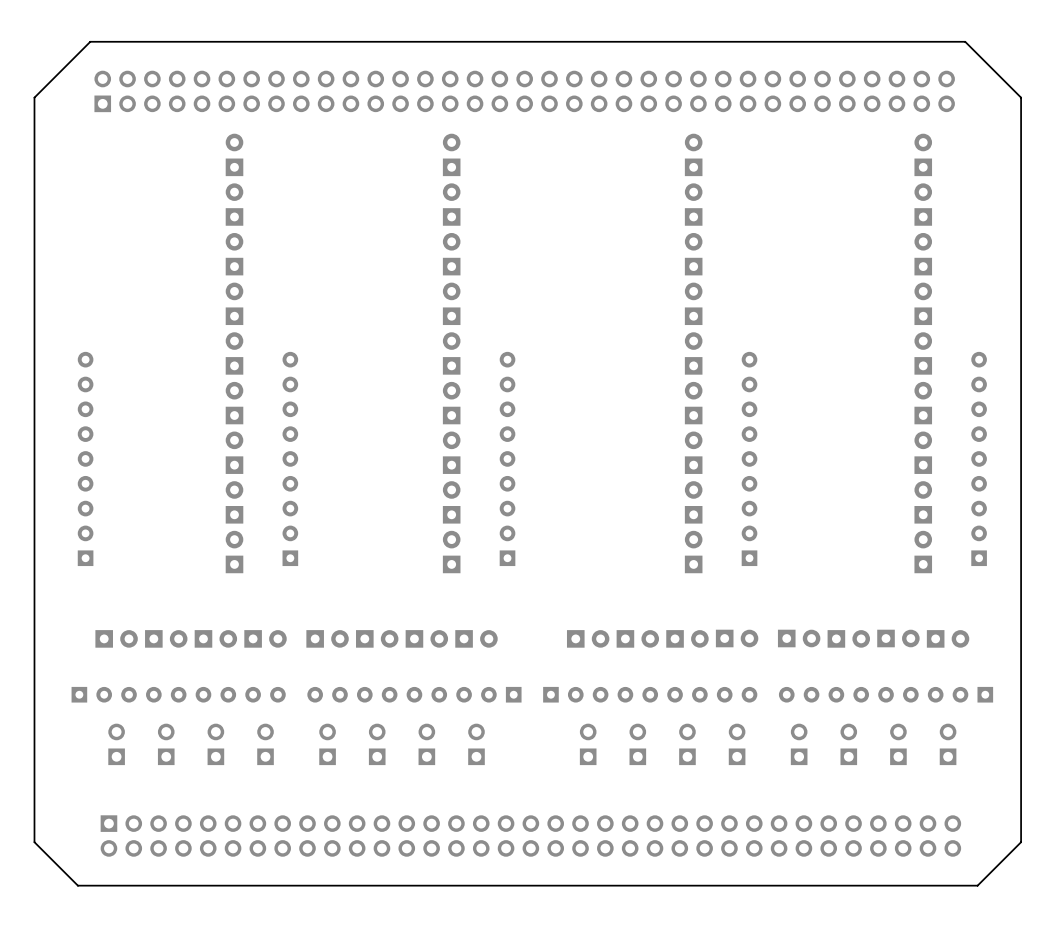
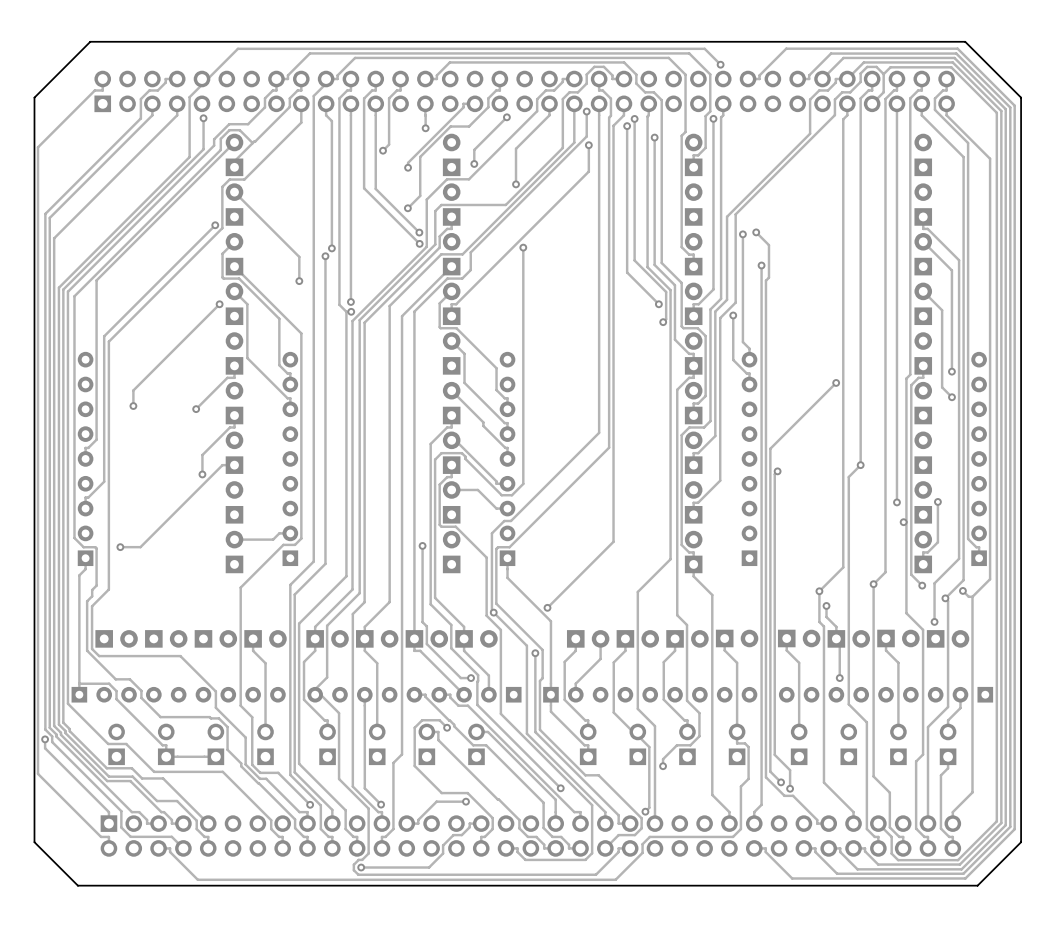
track: none -> (720, 64) (704, 48) (237, 48) (189, 97) (189, 157) (58, 287) (58, 724) (109, 776) (132, 776) (157, 801) (177, 801) (196, 820) (196, 829) (204, 836) (208, 836) (208, 848)
via: none -> (720, 64)
track: none -> (883, 74) (883, 92) (872, 103)
track: none -> (883, 74) (890, 67) (951, 67) (996, 112) (996, 821) (958, 860) (898, 860) (891, 853) (891, 836) (878, 823)
track: none -> (883, 74) (876, 66) (867, 66) (860, 73) (860, 81) (850, 92) (842, 92) (834, 99) (834, 115) (735, 214) (735, 302) (720, 318) (720, 480) (698, 502) (693, 502) (693, 514)
track: none -> (102, 79) (102, 90) (94, 90) (38, 147) (38, 773) (101, 836) (108, 836) (108, 848)
track: none -> (177, 79) (165, 79) (165, 82) (157, 90) (149, 90) (140, 99) (140, 118) (45, 213) (45, 729) (52, 736) (52, 742) (121, 811) (121, 827) (130, 836) (171, 836) (183, 848)
track: none -> (301, 79) (301, 90) (297, 90) (289, 98) (289, 106) (252, 143)
track: none -> (326, 79) (337, 79) (337, 75) (355, 57) (668, 57) (685, 74) (685, 131) (681, 135) (681, 247) (689, 254) (693, 254) (693, 266)
track: none -> (330, 79) (313, 96) (313, 561) (290, 584) (290, 774) (320, 805) (320, 829) (328, 836) (332, 836) (332, 848)
track: none -> (350, 79) (350, 90) (347, 90) (339, 98) (339, 304) (346, 311)
track: none -> (375, 79) (375, 90) (372, 90) (364, 98) (364, 188) (419, 243)
track: none -> (400, 79) (400, 90) (396, 90) (389, 98) (389, 144) (383, 150)
track: none -> (425, 79) (436, 79) (436, 75) (449, 62) (624, 62) (636, 74) (636, 83) (645, 92) (653, 92) (661, 100) (661, 263) (681, 282) (681, 326) (683, 328) (697, 328) (705, 336) (705, 396) (698, 403) (693, 403) (693, 415)
track: none -> (499, 79) (499, 90) (496, 90) (488, 98) (488, 107) (469, 126) (450, 126) (420, 156) (420, 195) (407, 208)
track: none -> (574, 79) (562, 79) (562, 81) (554, 90) (545, 90) (537, 99) (537, 111) (469, 179) (447, 179) (426, 199) (426, 246) (352, 321) (352, 589) (315, 626) (315, 650) (304, 662) (304, 699) (324, 720) (327, 720) (327, 731)
track: none -> (599, 79) (599, 90) (602, 90) (610, 98) (610, 115) (609, 117) (609, 447) (509, 547) (496, 548) (496, 603) (542, 649) (542, 678) (539, 680) (539, 729) (585, 775) (598, 775) (641, 818) (641, 828) (634, 835) (618, 835) (605, 848)
track: none -> (623, 79) (612, 79) (612, 75) (603, 66) (594, 66) (586, 74) (586, 83) (577, 92) (569, 92) (562, 99) (562, 147) (505, 204) (441, 204) (435, 211) (435, 244) (359, 320) (359, 593) (327, 625) (327, 677) (315, 689) (315, 694)
track: none -> (748, 79) (759, 79) (759, 75) (786, 48) (957, 48) (1014, 105) (1014, 829) (965, 878) (792, 878) (765, 852) (765, 848) (754, 848)
track: none -> (797, 79) (809, 79) (809, 75) (831, 53) (956, 53) (1010, 107) (1010, 826) (963, 873) (837, 873) (815, 852) (815, 848) (803, 848)
track: none -> (822, 79) (843, 57) (954, 57) (1005, 109) (1005, 825) (961, 869) (857, 869) (840, 852) (840, 848) (828, 848)
track: none -> (872, 79) (872, 90) (868, 90) (860, 98) (860, 465) (848, 477) (848, 704) (866, 722) (866, 829) (874, 836) (878, 836) (878, 848)
track: none -> (896, 79) (896, 90) (894, 90) (885, 99) (885, 572) (873, 584) (873, 776) (889, 792) (889, 827) (899, 836) (903, 836) (903, 848)
track: none -> (921, 79) (921, 90) (918, 90) (910, 98) (910, 374) (906, 378) (906, 613) (923, 629) (923, 754) (916, 761) (916, 828) (924, 836) (928, 836) (928, 848)
track: none -> (946, 79) (946, 90) (943, 90) (934, 98) (934, 109) (968, 143) (968, 538) (976, 547) (979, 547) (979, 558)
track: none -> (152, 103) (152, 115) (49, 217) (49, 727) (131, 812) (139, 812) (147, 820) (147, 823) (158, 823)
track: none -> (177, 103) (177, 115) (54, 238) (54, 725) (107, 781) (130, 781) (171, 819) (171, 823) (183, 823)
track: none -> (301, 103) (301, 122) (244, 179) (229, 179) (222, 186) (222, 228) (108, 341) (108, 589) (92, 606) (92, 648) (99, 656) (180, 656) (215, 691) (215, 707) (245, 737) (245, 764) (259, 778) (266, 778) (299, 812) (307, 812) (307, 823)
track: none -> (326, 103) (326, 115) (331, 121) (331, 248)
track: none -> (350, 103) (350, 301)
track: none -> (375, 103) (375, 188) (419, 232)
track: none -> (425, 103) (425, 128)
track: none -> (475, 103) (463, 103) (463, 107) (408, 162) (408, 167)
track: none -> (549, 103) (549, 115) (516, 148) (516, 184)
track: none -> (574, 103) (574, 142) (462, 254) (441, 254) (389, 306) (389, 602) (364, 626) (364, 650) (377, 663) (377, 731)
track: none -> (599, 103) (599, 432) (511, 520) (504, 520) (491, 533) (491, 610) (526, 645) (526, 733) (605, 812) (605, 823)
track: none -> (623, 103) (623, 115) (613, 125) (613, 541) (547, 607)
track: none -> (648, 103) (647, 267) (670, 290) (670, 559) (637, 591) (637, 708) (654, 726) (654, 823)
track: none -> (723, 103) (723, 115) (721, 117) (721, 298) (710, 309) (710, 421) (704, 427) (689, 427) (681, 435) (681, 544) (689, 552) (693, 552) (693, 576) (712, 595) (712, 794) (729, 812) (729, 823)
track: none -> (847, 103) (847, 115) (843, 119) (843, 567) (819, 591) (819, 621) (823, 626) (823, 782) (853, 812) (853, 823)
track: none -> (896, 103) (896, 502)
track: none -> (921, 103) (921, 115) (963, 157) (963, 580) (945, 598) (948, 601) (948, 707) (928, 727) (928, 823)
track: none -> (946, 103) (946, 115) (990, 158) (990, 579) (972, 596)
track: none -> (586, 111) (586, 136) (470, 252) (470, 270) (462, 278) (447, 278) (414, 311) (414, 650) (420, 650) (464, 694)
via: none -> (586, 111)
track: none -> (506, 117) (474, 149) (474, 163)
via: none -> (506, 117)
track: none -> (203, 118) (203, 149) (63, 289) (63, 722) (106, 768) (131, 768) (142, 778) (163, 778) (208, 823)
via: none -> (203, 118)
track: none -> (634, 118) (634, 260) (666, 291) (666, 319) (663, 322)
via: none -> (634, 118)
track: none -> (713, 118) (713, 289) (698, 304) (693, 304) (693, 316)
via: none -> (713, 118)
track: none -> (627, 126) (627, 272) (658, 304)
via: none -> (627, 126)
via: none -> (425, 128)
track: none -> (654, 137) (654, 264) (674, 285) (674, 339) (689, 353) (693, 353) (693, 377) (689, 377) (677, 389) (677, 615) (687, 625) (687, 700) (699, 713) (699, 736) (690, 745) (676, 745) (663, 759) (663, 766)
via: none -> (654, 137)
track: none -> (234, 142) (96, 280) (96, 439) (88, 447) (85, 447) (85, 458)
track: none -> (252, 143) (234, 161) (234, 167)
track: none -> (252, 143) (239, 130) (229, 130) (220, 138) (220, 149) (74, 296) (74, 538) (83, 547) (96, 548) (96, 585) (92, 590) (92, 596) (87, 601) (87, 650) (115, 679) (129, 679) (141, 690) (141, 697) (160, 717) (218, 718) (227, 727) (227, 749) (241, 763) (241, 766) (295, 819) (295, 828) (303, 836) (307, 836) (307, 848)
track: none -> (588, 145) (588, 171) (456, 304) (451, 304) (451, 316)
via: none -> (588, 145)
via: none -> (383, 150)
via: none -> (474, 163)
via: none -> (408, 167)
track: none -> (693, 167) (693, 155) (698, 155) (705, 147) (705, 116) (710, 111) (710, 74) (689, 53) (309, 53) (287, 75) (287, 79) (276, 79) (276, 90) (272, 90) (264, 98) (264, 107) (248, 124) (229, 124) (214, 139) (214, 145) (67, 291) (67, 703) (108, 743) (126, 743) (154, 771) (222, 771) (271, 820) (271, 829) (279, 836) (282, 836) (282, 848)
via: none -> (516, 184)
track: none -> (234, 192) (299, 256) (299, 281)
via: none -> (407, 208)
track: none -> (451, 216) (451, 228) (447, 228) (439, 236) (439, 247) (364, 322) (364, 602) (352, 614) (352, 786) (378, 812) (381, 812) (381, 823)
track: none -> (923, 216) (923, 228) (927, 228) (959, 260) (959, 558) (934, 583) (934, 621)
track: none -> (215, 225) (104, 336) (104, 481) (88, 497) (85, 497) (85, 508)
via: none -> (215, 225)
via: none -> (419, 232)
track: none -> (756, 232) (768, 245) (768, 277) (765, 280) (765, 777) (784, 795) (793, 795) (817, 820) (817, 823) (828, 823)
via: none -> (756, 232)
track: none -> (742, 234) (742, 342) (749, 348) (749, 359)
via: none -> (742, 234)
track: none -> (234, 241) (222, 253) (222, 277) (239, 278) (279, 318) (279, 365) (287, 373) (290, 373) (290, 384)
track: none -> (923, 241) (951, 270) (951, 371)
via: none -> (419, 243)
track: none -> (523, 247) (523, 483) (511, 495) (501, 495) (461, 453) (441, 453) (435, 459) (435, 597) (464, 626) (464, 650) (488, 675) (488, 694)
via: none -> (523, 247)
via: none -> (331, 248)
track: none -> (325, 256) (325, 563) (294, 594) (294, 772) (332, 809) (332, 823)
via: none -> (325, 256)
track: none -> (761, 265) (761, 804) (754, 812) (754, 823)
via: none -> (761, 265)
track: none -> (234, 266) (301, 333) (301, 538) (295, 544) (283, 544) (240, 587) (240, 705) (252, 717) (252, 764) (260, 772) (278, 772) (310, 804)
track: none -> (451, 266) (402, 316) (402, 754) (393, 762) (393, 829) (385, 836) (381, 836) (381, 848)
via: none -> (299, 281)
track: none -> (234, 291) (247, 304) (247, 358) (287, 398) (290, 398) (290, 409)
track: none -> (451, 291) (439, 303) (439, 327) (456, 328) (496, 368) (496, 390) (504, 398) (507, 398) (507, 409)
track: none -> (923, 291) (942, 310) (942, 387) (951, 397)
via: none -> (350, 301)
track: none -> (219, 304) (133, 390) (133, 406)
via: none -> (219, 304)
via: none -> (658, 304)
track: none -> (346, 311) (346, 576) (299, 623) (299, 763) (345, 810) (345, 829) (353, 836) (357, 836) (357, 848)
via: none -> (351, 311)
track: none -> (733, 315) (733, 359) (746, 373) (749, 373) (749, 384)
via: none -> (733, 315)
via: none -> (663, 322)
track: none -> (451, 341) (464, 353) (464, 382) (504, 423) (507, 423) (507, 434)
track: none -> (234, 365) (234, 377) (227, 377) (196, 409)
track: none -> (923, 365) (923, 377) (918, 377) (911, 385) (911, 574) (922, 585)
via: none -> (951, 371)
track: none -> (836, 382) (770, 448) (770, 771) (781, 782)
via: none -> (836, 382)
track: none -> (451, 390) (483, 422) (483, 425) (507, 447) (507, 458)
via: none -> (951, 397)
via: none -> (133, 406)
via: none -> (196, 409)
track: none -> (234, 415) (234, 427) (230, 427) (202, 455) (202, 474)
track: none -> (451, 415) (451, 427) (447, 427) (430, 443) (430, 604) (451, 624) (451, 648) (478, 675) (477, 704) (560, 788)
track: none -> (451, 440) (455, 440) (496, 481) (496, 483) (507, 483)
track: none -> (234, 465) (222, 465) (140, 547) (120, 547)
track: none -> (451, 465) (451, 477) (447, 477) (439, 484) (439, 524) (441, 526) (455, 526) (486, 557) (486, 615) (500, 629) (500, 713) (592, 805) (592, 853) (585, 859) (525, 859) (517, 852) (517, 848) (506, 848)
track: none -> (693, 465) (693, 453) (698, 453) (715, 436) (715, 311) (727, 299) (727, 216) (810, 133) (810, 99) (819, 90) (827, 90) (835, 82) (835, 79) (847, 79) (863, 62) (952, 62) (1001, 111) (1001, 823) (959, 864) (878, 864) (865, 851) (865, 848) (853, 848)
via: none -> (860, 465)
track: none -> (777, 471) (774, 474) (774, 754) (790, 770) (790, 788)
via: none -> (777, 471)
via: none -> (202, 474)
track: none -> (451, 489) (477, 489) (496, 508) (507, 508)
track: none -> (937, 501) (937, 542) (927, 552) (923, 552) (923, 564)
via: none -> (937, 501)
via: none -> (896, 502)
via: none -> (903, 522)
track: none -> (290, 533) (279, 533) (273, 539) (234, 539)
track: none -> (422, 545) (422, 622) (426, 626) (426, 644) (460, 678) (471, 678)
via: none -> (422, 545)
via: none -> (120, 547)
track: none -> (85, 558) (85, 569) (79, 575) (79, 694)
track: none -> (507, 558) (507, 577) (550, 621) (550, 711) (584, 745) (588, 745) (588, 756)
via: none -> (873, 584)
via: none -> (922, 585)
track: none -> (962, 590) (968, 596) (972, 596)
via: none -> (962, 590)
via: none -> (819, 591)
track: none -> (972, 596) (972, 792) (952, 812) (952, 823)
via: none -> (945, 598)
track: none -> (826, 605) (826, 617) (836, 626) (836, 638)
via: none -> (826, 605)
via: none -> (547, 607)
via: none -> (493, 612)
via: none -> (934, 621)
track: none -> (836, 632) (839, 636) (839, 678)
track: none -> (253, 638) (253, 650) (265, 663) (265, 731)
track: none -> (575, 638) (575, 650) (564, 661) (564, 699) (585, 720) (588, 720) (588, 731)
track: none -> (600, 638) (600, 658) (575, 683) (575, 694)
track: none -> (625, 638) (625, 650) (613, 662) (613, 712) (633, 731) (637, 731)
track: none -> (675, 638) (675, 650) (663, 662) (663, 699) (684, 720) (687, 720) (687, 731)
track: none -> (724, 638) (724, 650) (737, 662) (737, 743) (744, 743) (748, 747) (748, 778) (740, 786) (740, 829) (733, 836) (649, 836) (642, 844) (642, 852) (615, 879) (197, 879) (170, 852) (170, 848) (158, 848)
track: none -> (786, 638) (786, 650) (799, 662) (799, 731)
track: none -> (886, 638) (886, 650) (898, 662) (898, 731)
track: none -> (535, 653) (535, 732) (618, 815) (618, 823) (630, 823)
via: none -> (535, 653)
via: none -> (471, 678)
via: none -> (839, 678)
track: none -> (79, 683) (109, 683) (116, 691) (116, 699) (162, 745) (166, 745) (166, 756) (215, 756)
track: none -> (315, 689) (339, 713) (339, 779) (368, 808) (368, 853) (353, 864) (353, 870) (358, 874) (595, 874) (618, 852) (618, 848) (630, 848)
track: none -> (364, 694) (364, 788) (381, 804)
track: none -> (414, 694) (425, 694) (473, 745) (486, 745) (543, 802) (543, 827) (552, 836) (561, 836) (569, 844) (569, 848) (580, 848)
track: none -> (439, 694) (450, 694) (450, 697) (458, 705) (467, 705) (574, 812) (580, 812) (580, 823)
track: none -> (960, 694) (960, 708) (948, 720) (948, 731)
track: none -> (447, 727) (439, 720) (422, 720) (414, 727) (414, 766) (441, 793) (467, 793) (492, 818) (492, 829) (484, 836) (481, 836) (481, 848)
via: none -> (447, 727)
track: none -> (426, 731) (438, 731) (438, 740) (519, 820) (519, 828) (527, 836) (536, 836) (544, 844) (544, 848) (555, 848)
track: none -> (476, 731) (487, 731) (555, 799) (555, 823)
track: none -> (634, 731) (649, 747) (649, 807) (645, 811)
track: none -> (45, 739) (45, 748) (108, 812) (108, 823)
via: none -> (45, 739)
track: none -> (948, 756) (948, 768) (940, 775) (940, 828) (949, 836) (952, 836) (952, 848)
via: none -> (663, 766)
via: none -> (781, 782)
via: none -> (560, 788)
via: none -> (790, 788)
track: none -> (466, 801) (436, 801) (418, 820) (418, 823) (406, 823)
via: none -> (466, 801)
via: none -> (310, 804)
via: none -> (381, 804)
via: none -> (645, 811)
track: none -> (481, 823) (469, 823) (469, 827) (461, 835) (453, 835) (443, 845) (443, 853) (429, 867) (361, 867)
via: none -> (361, 867)

